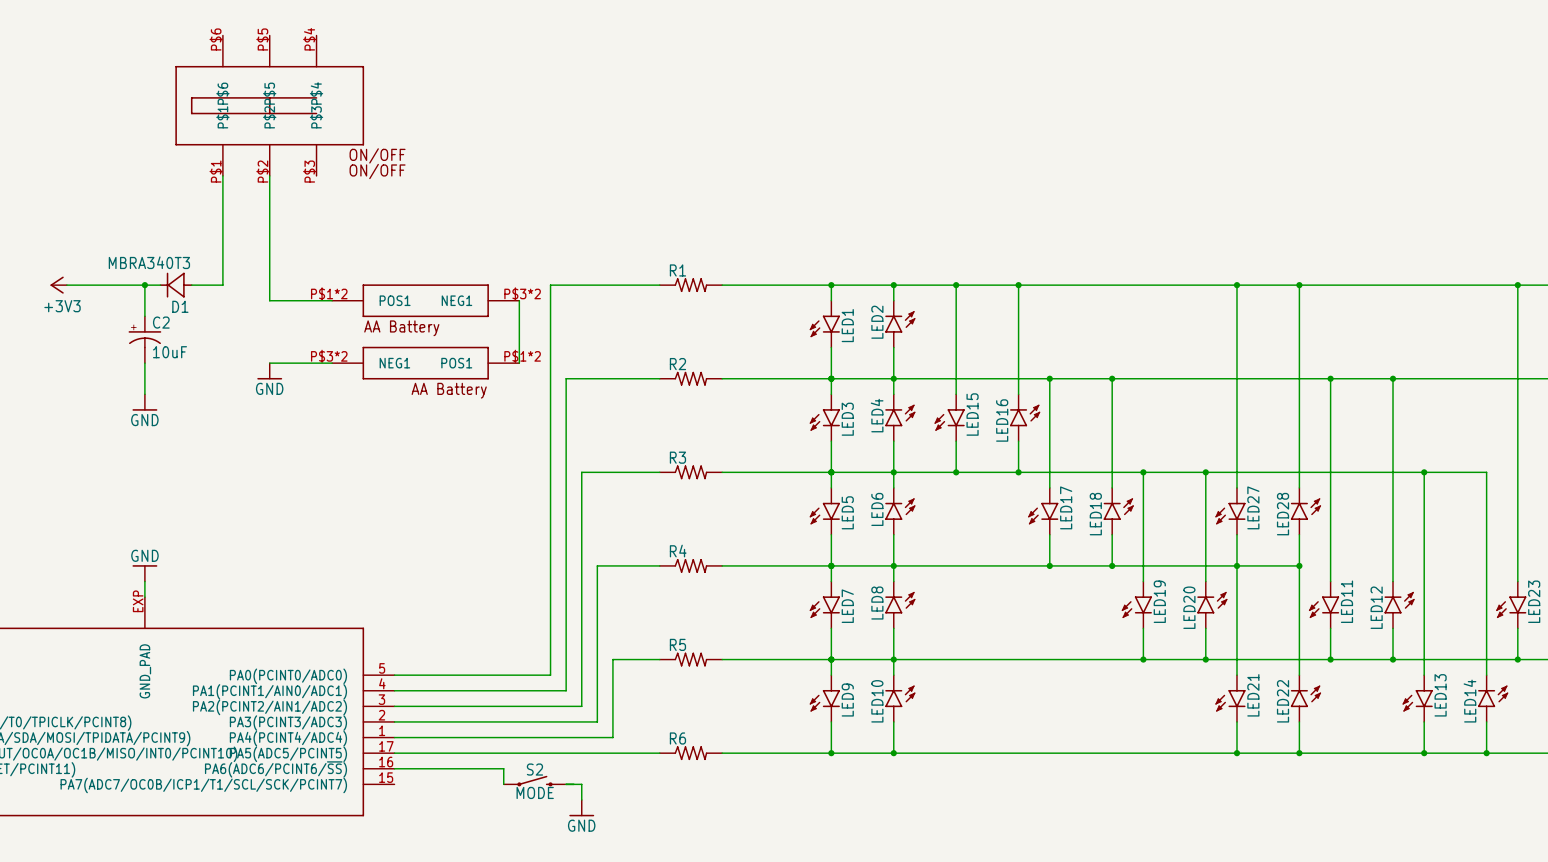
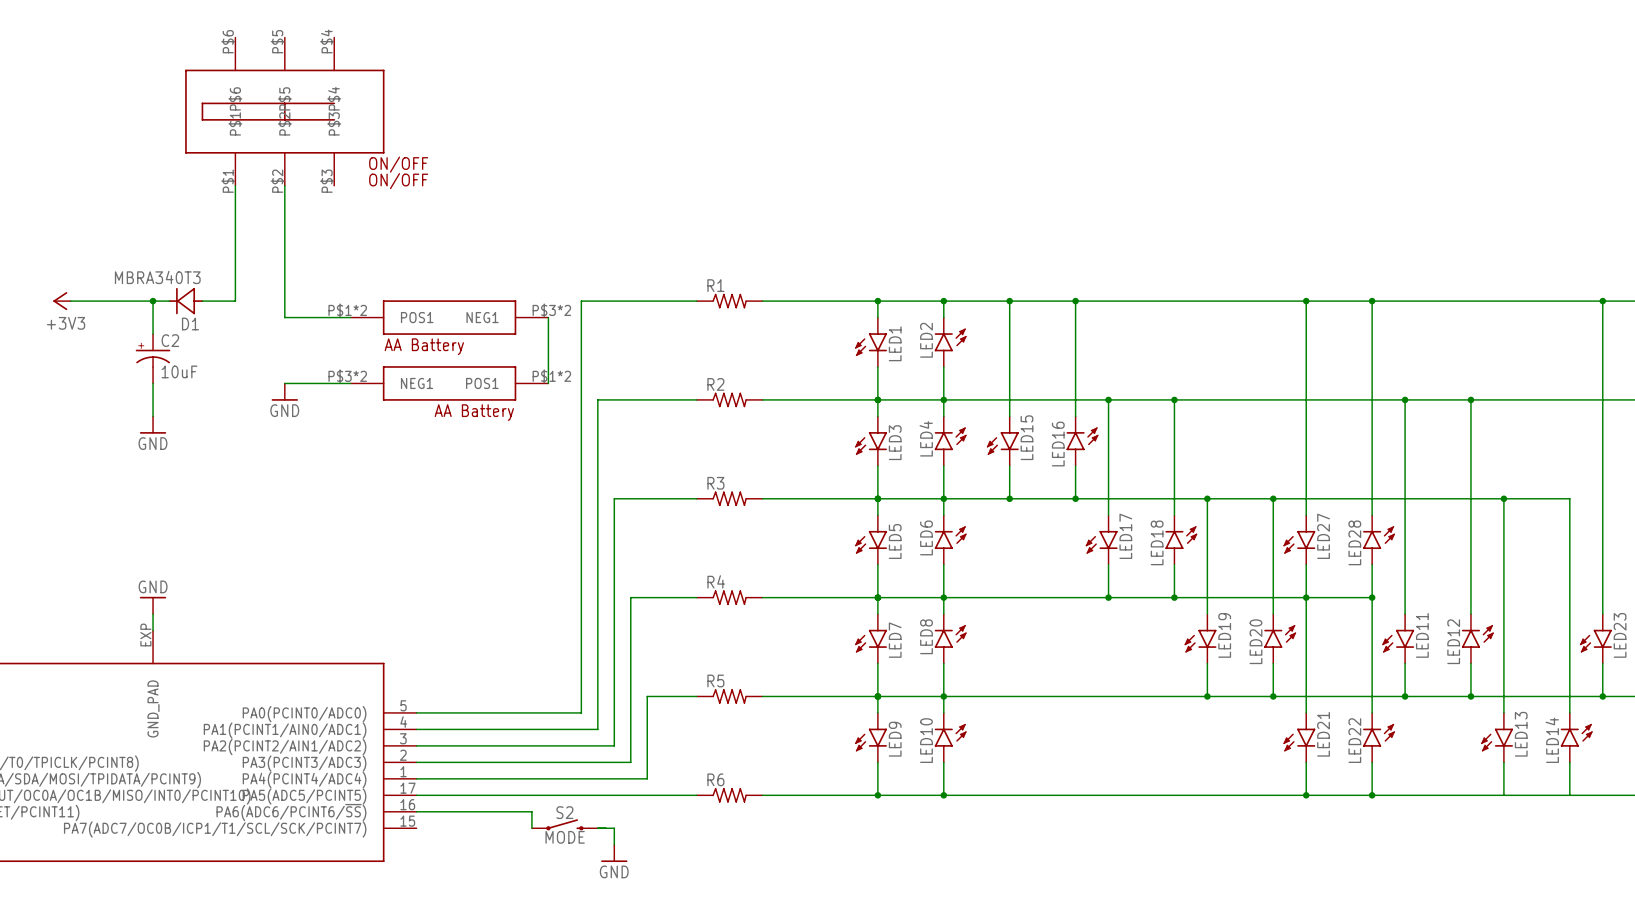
junction: (1424, 753) -> none
junction: (1486, 753) -> none

